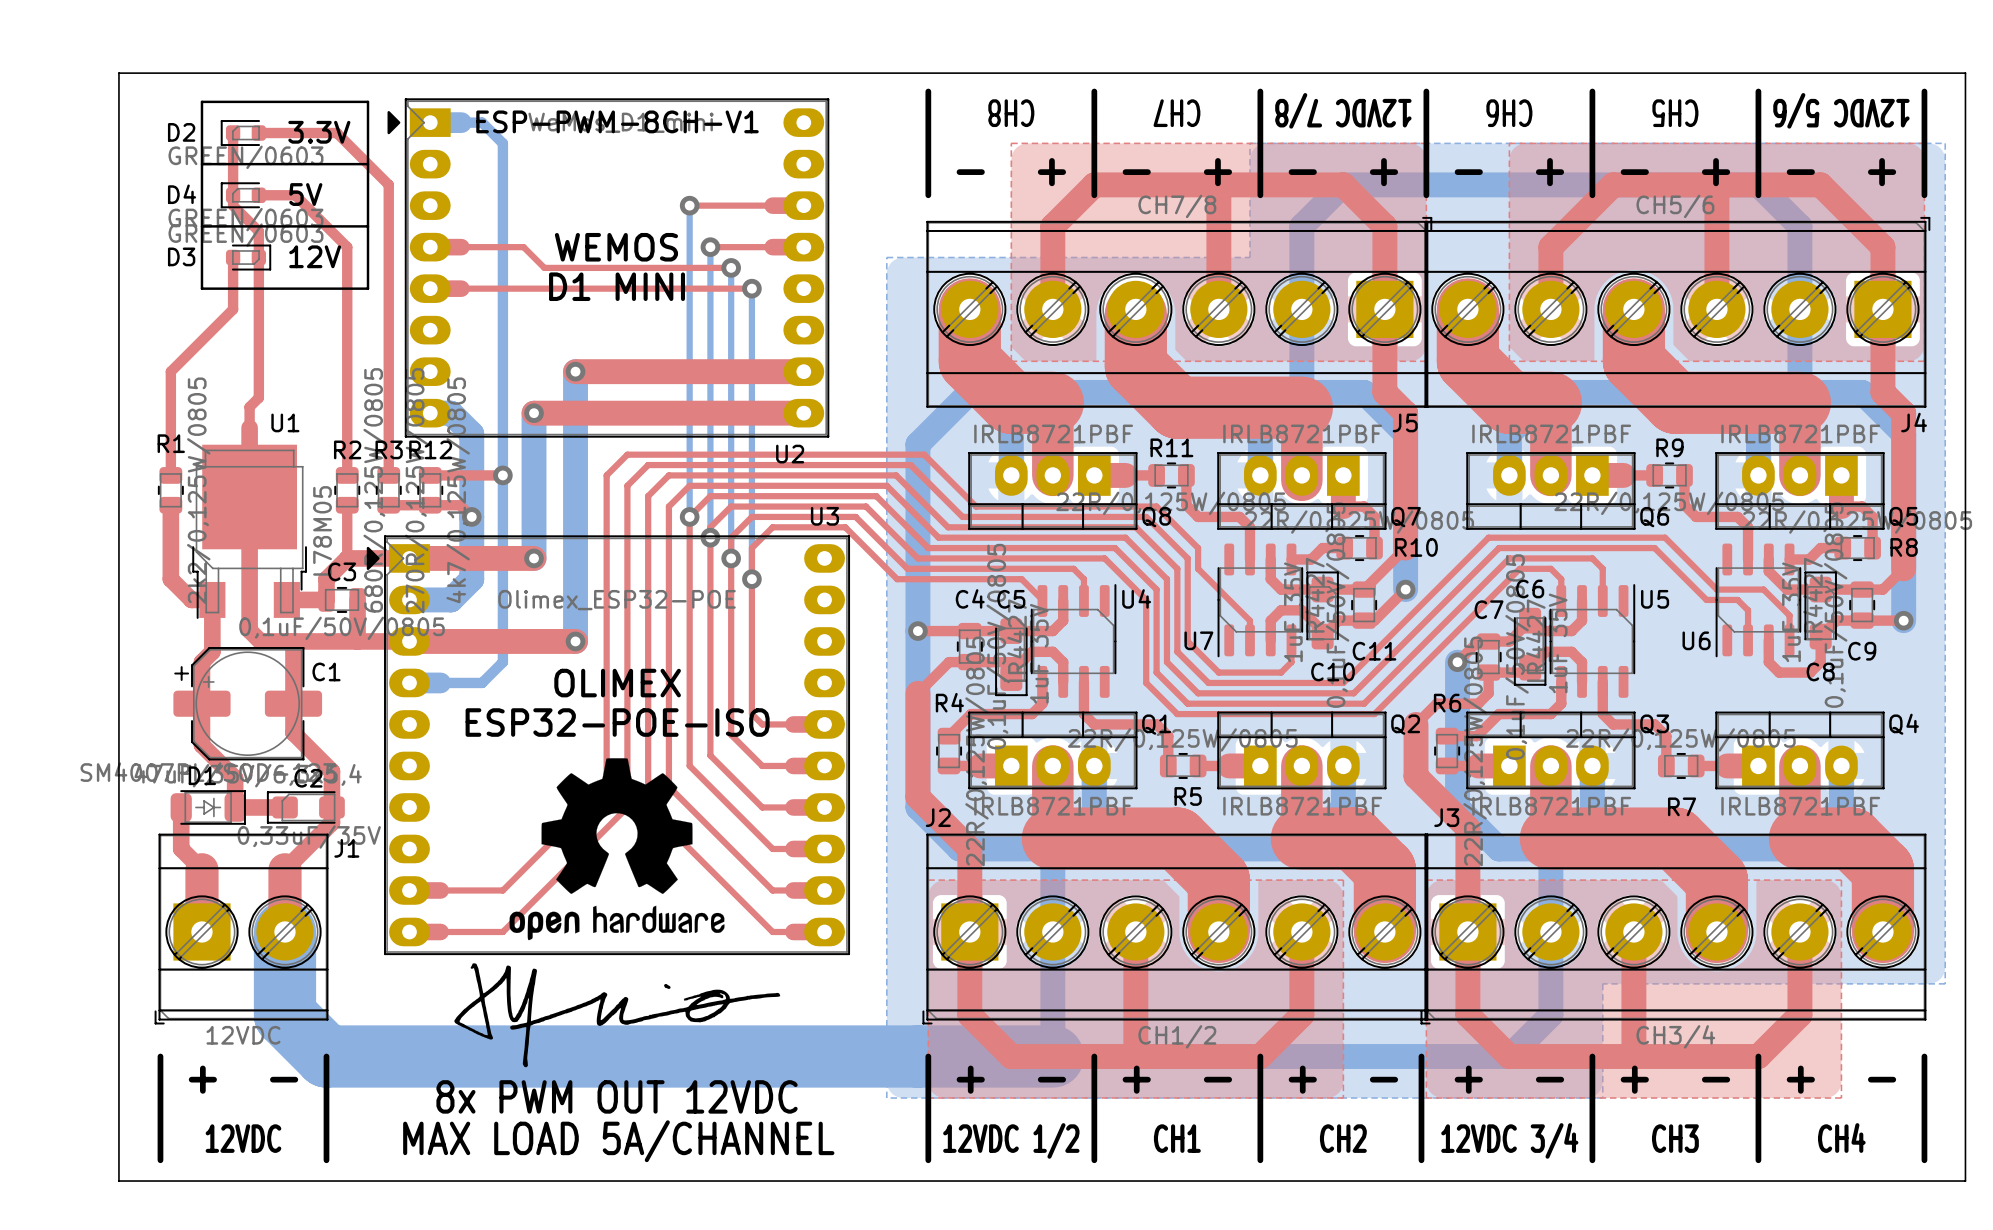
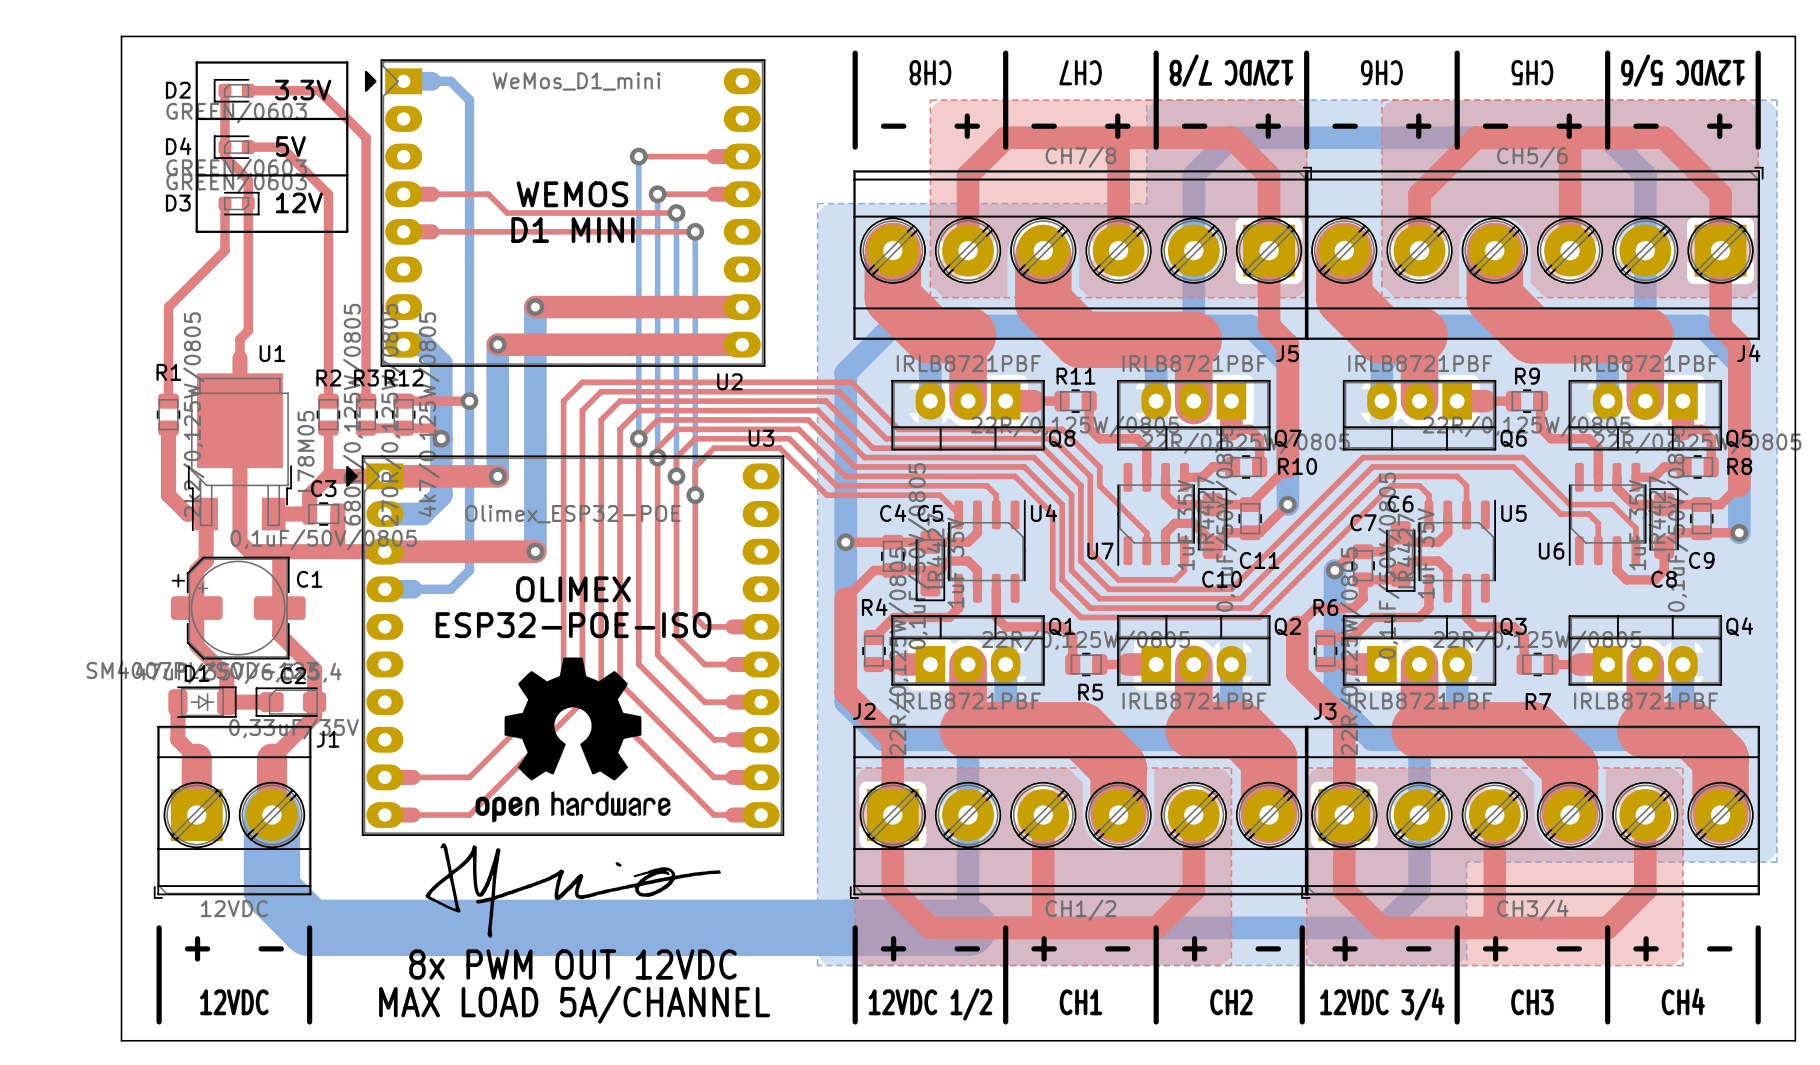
text: ESP-PWM-8CH-V1 (617, 121) -> none

